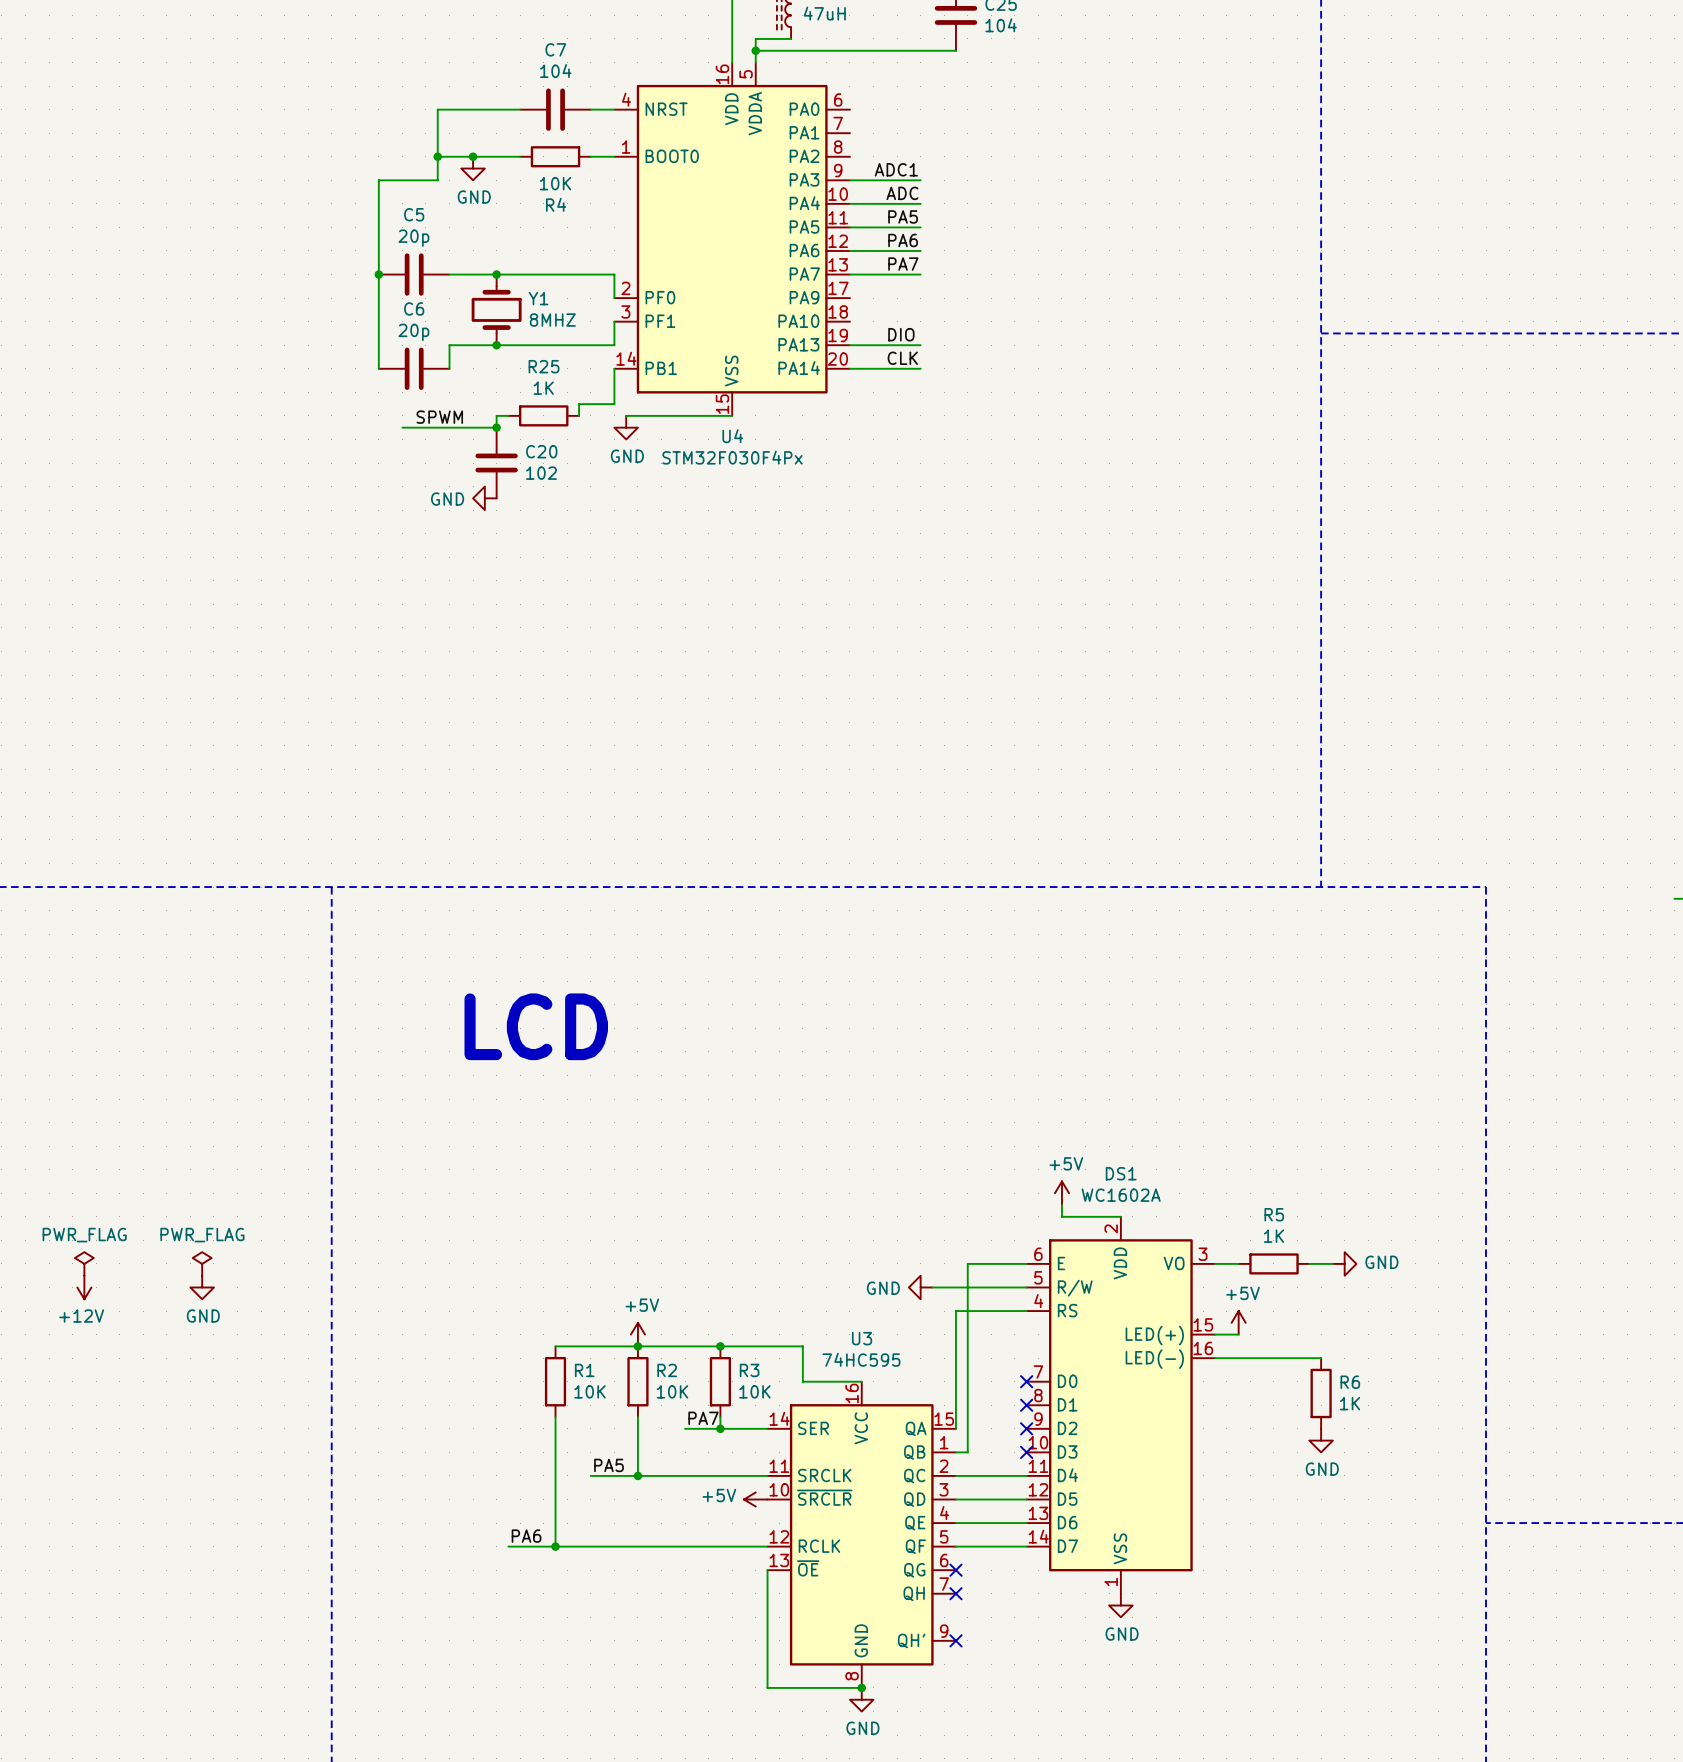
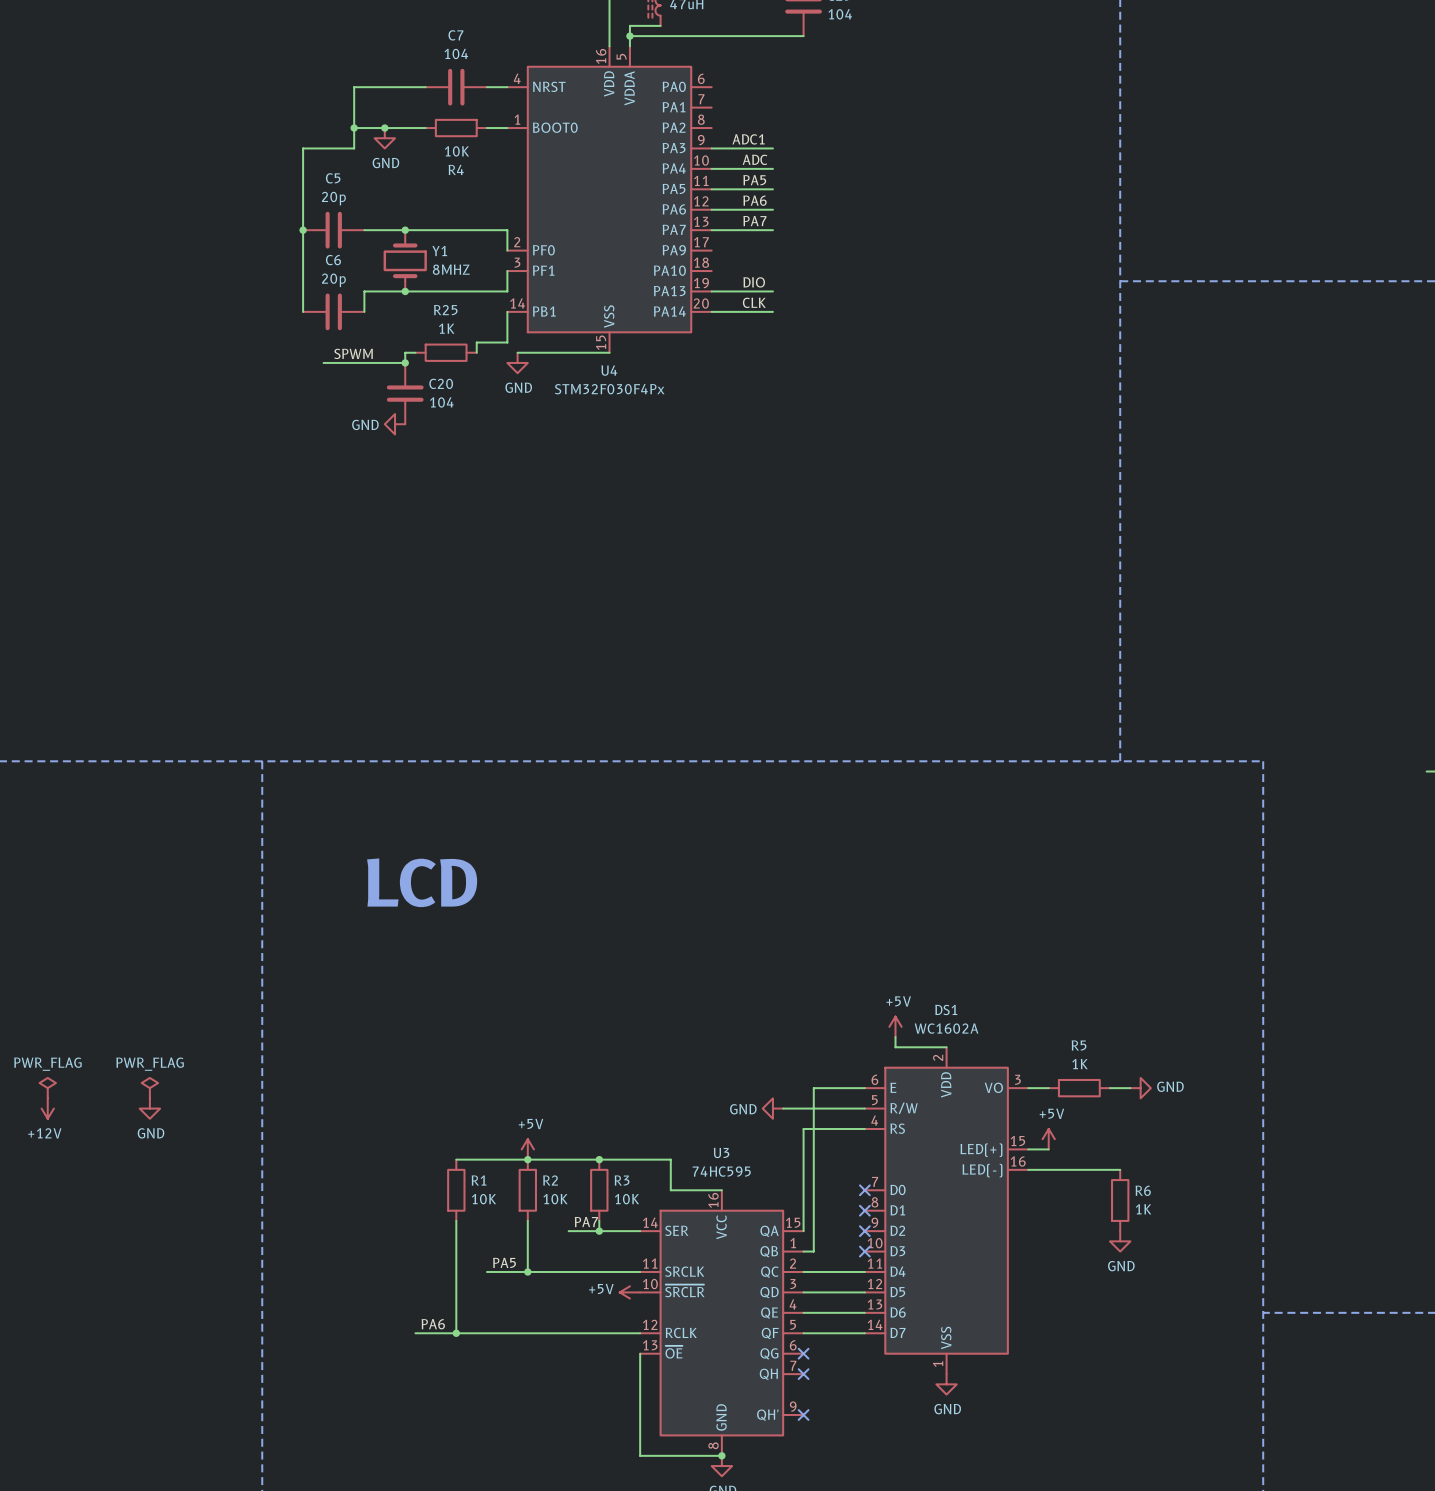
C20 value: 102 (541, 473) -> 104 (441, 402)

